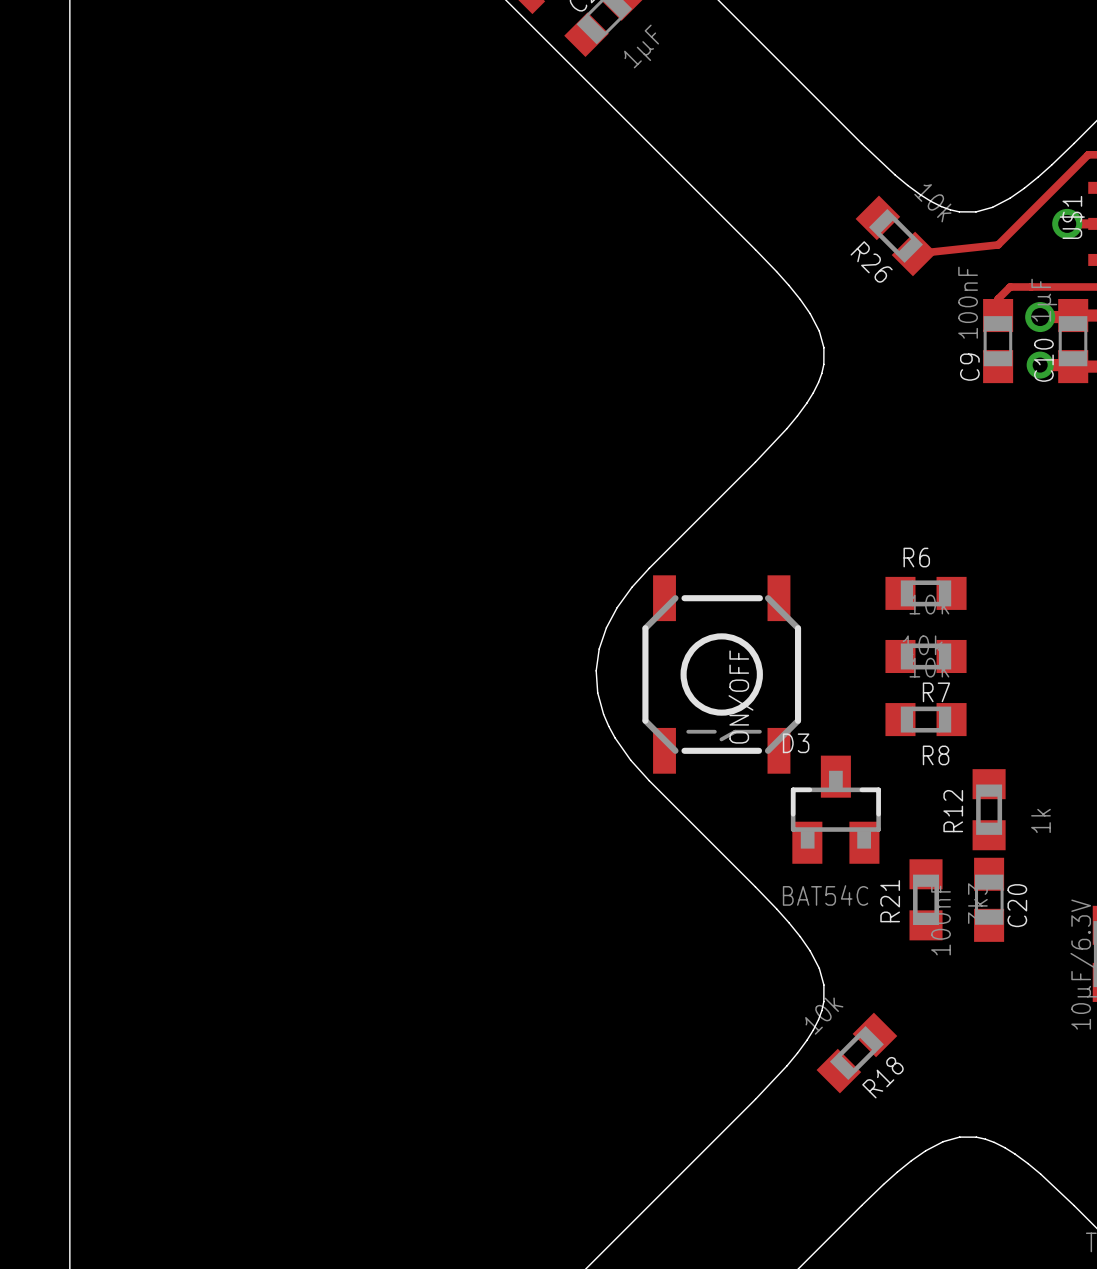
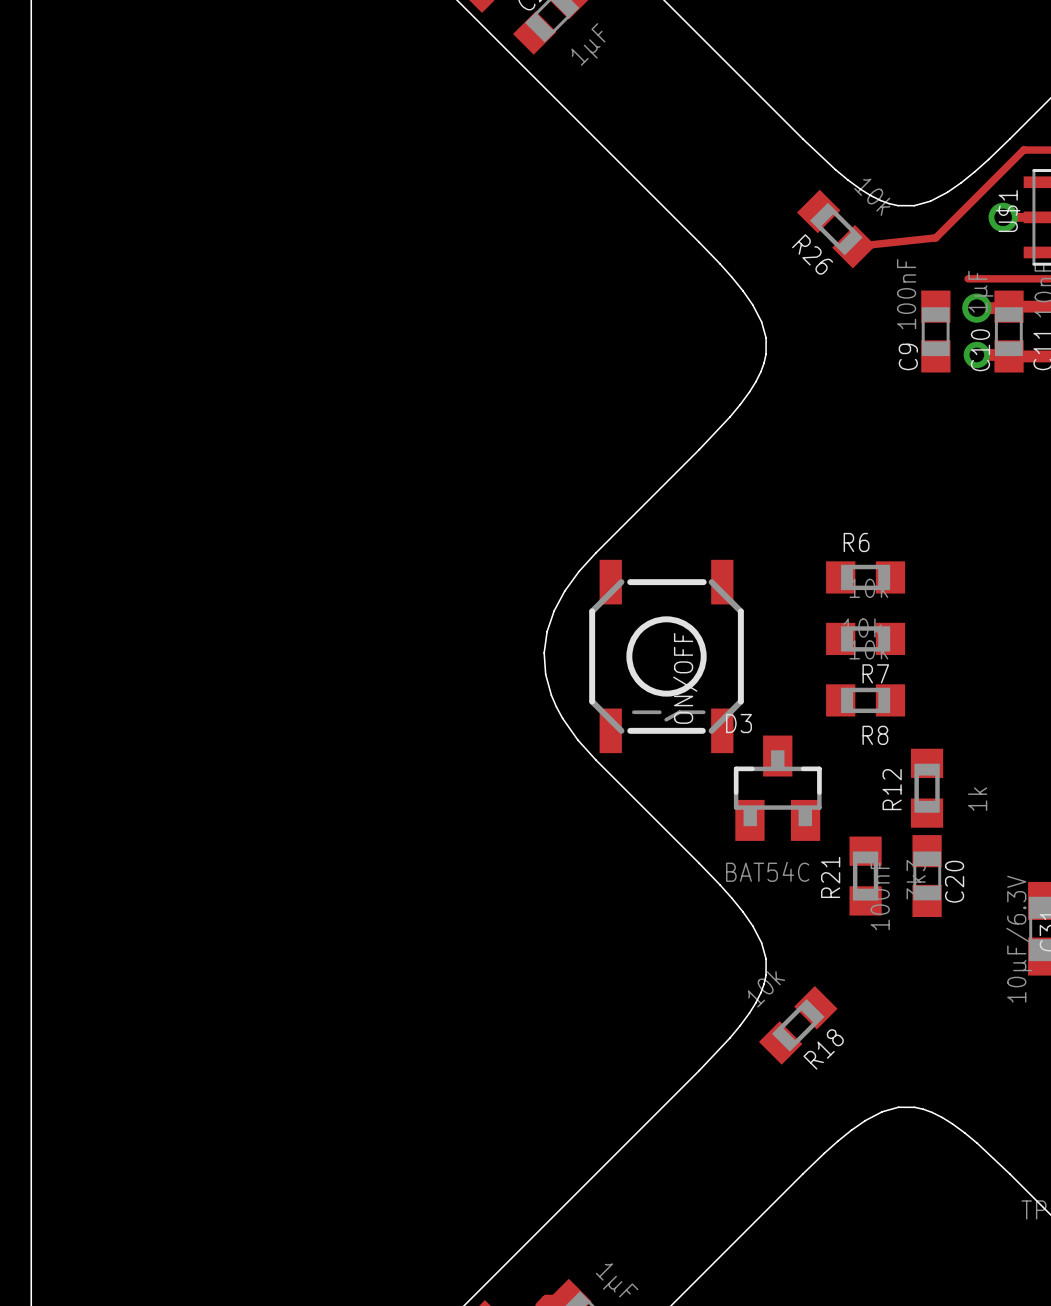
track: (1031, 286) (1010, 286) (998, 299) (998, 315) -> none

